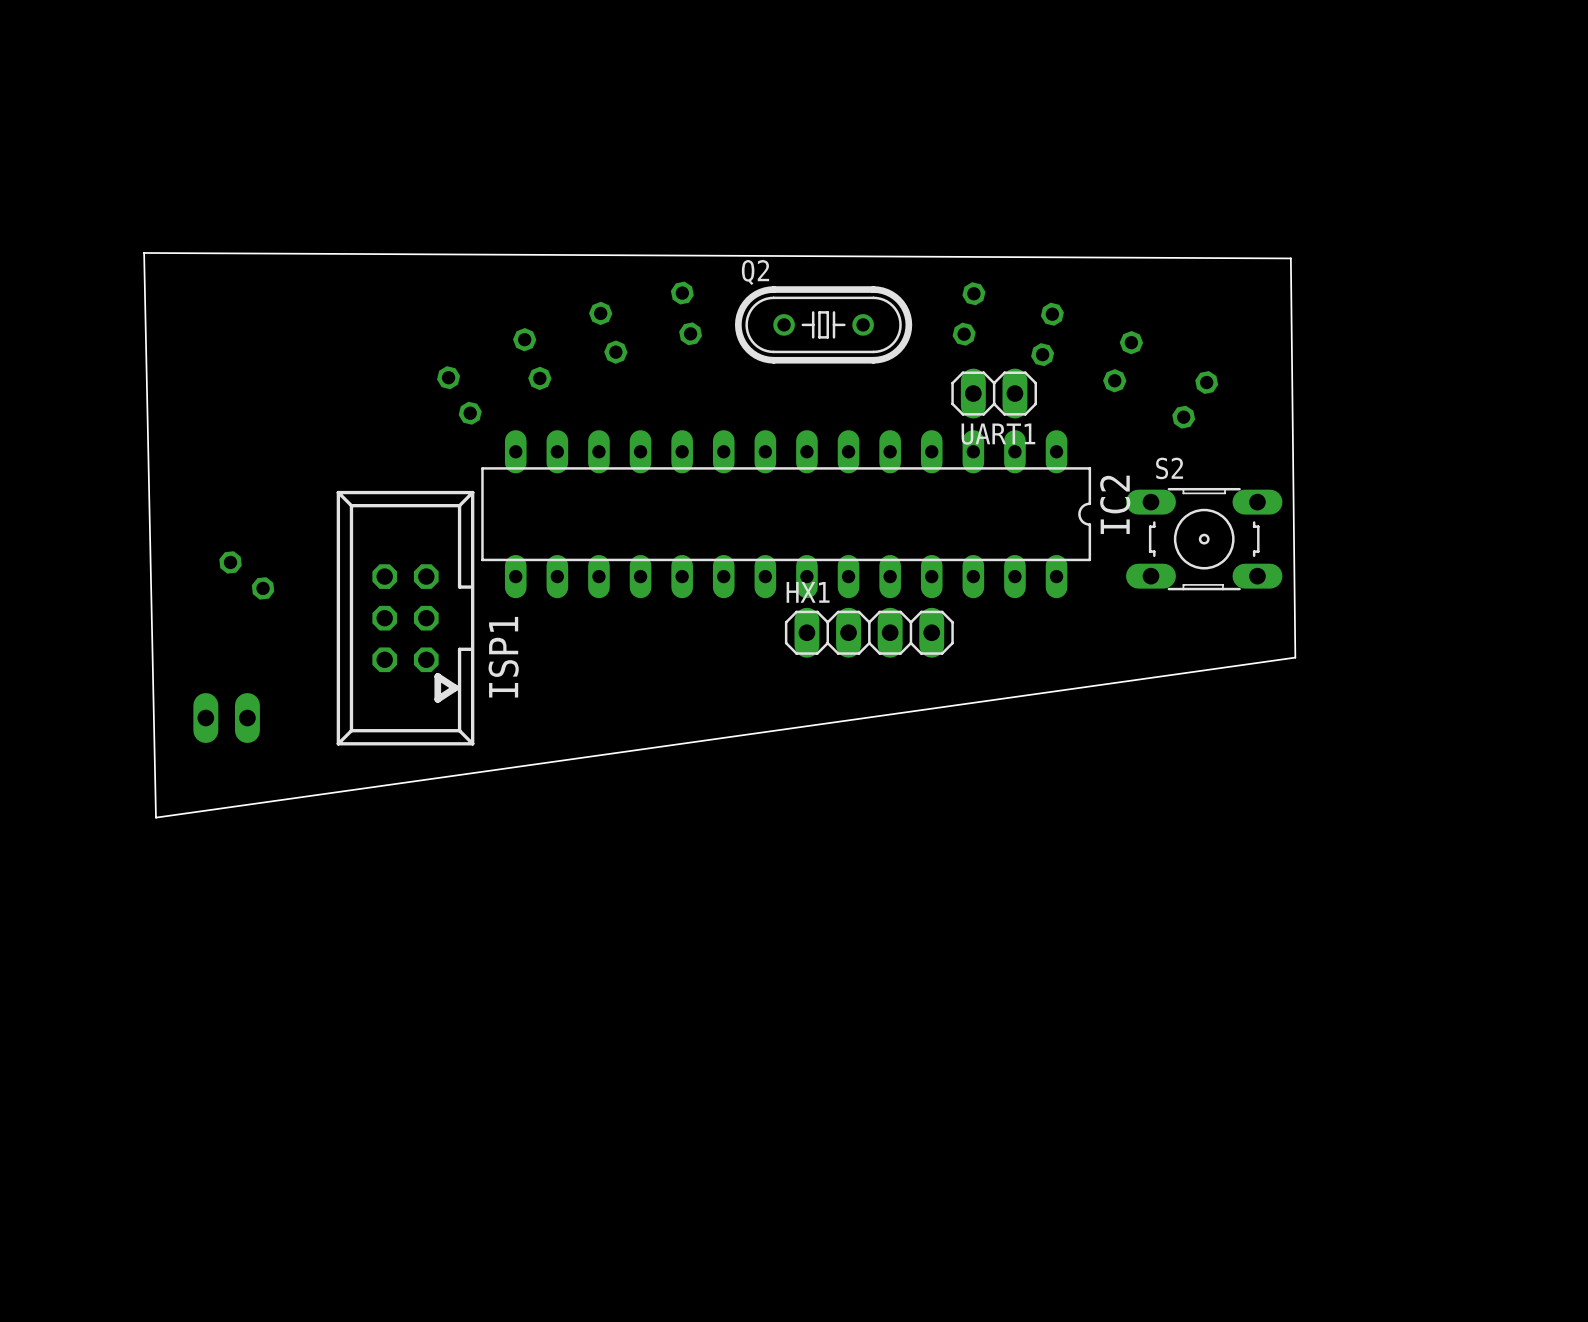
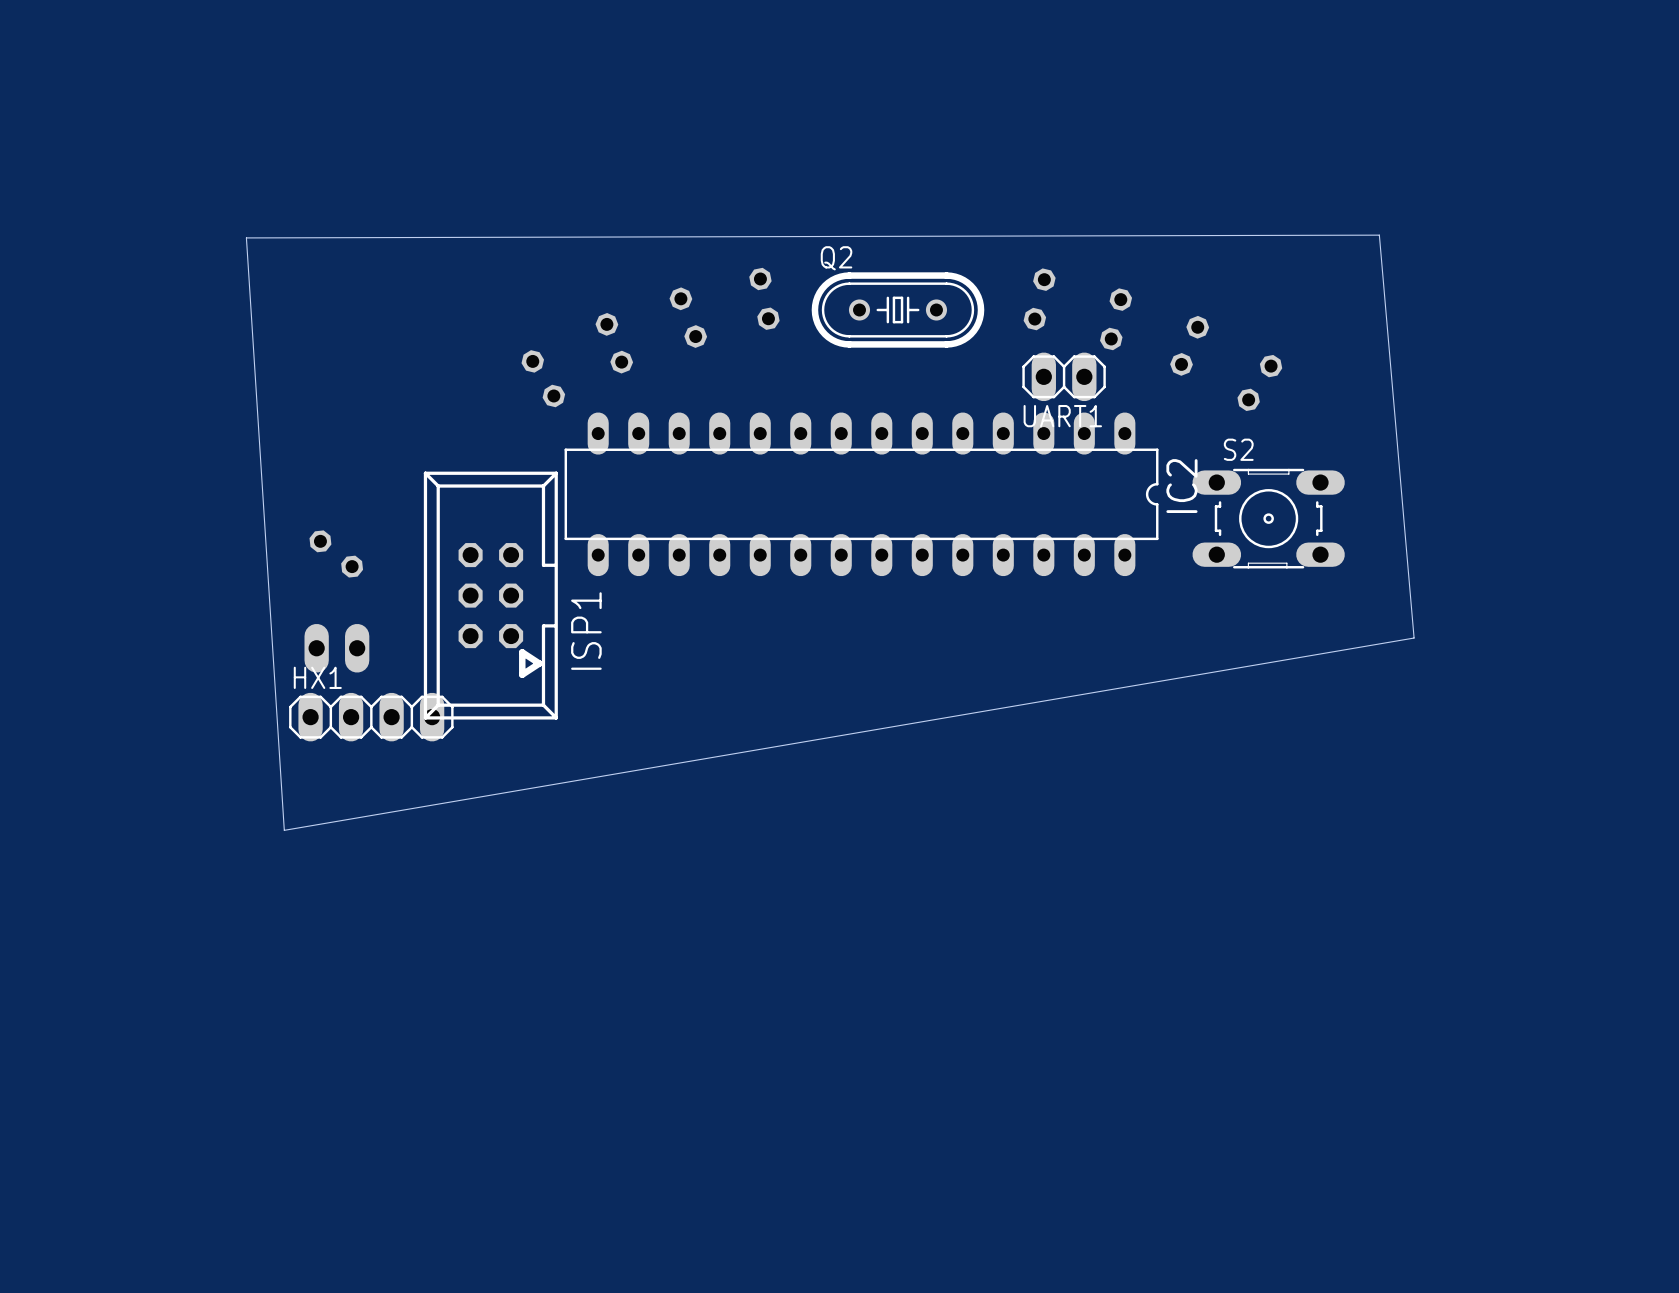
board edge: (144, 252) (1290, 258) (1295, 657) (155, 817) (144, 252) -> (1379, 235) (1414, 638) (284, 830) (246, 237) (1379, 235)
HX1 position: (869, 632) -> (371, 717)
part position: (226, 718) -> (336, 648)

